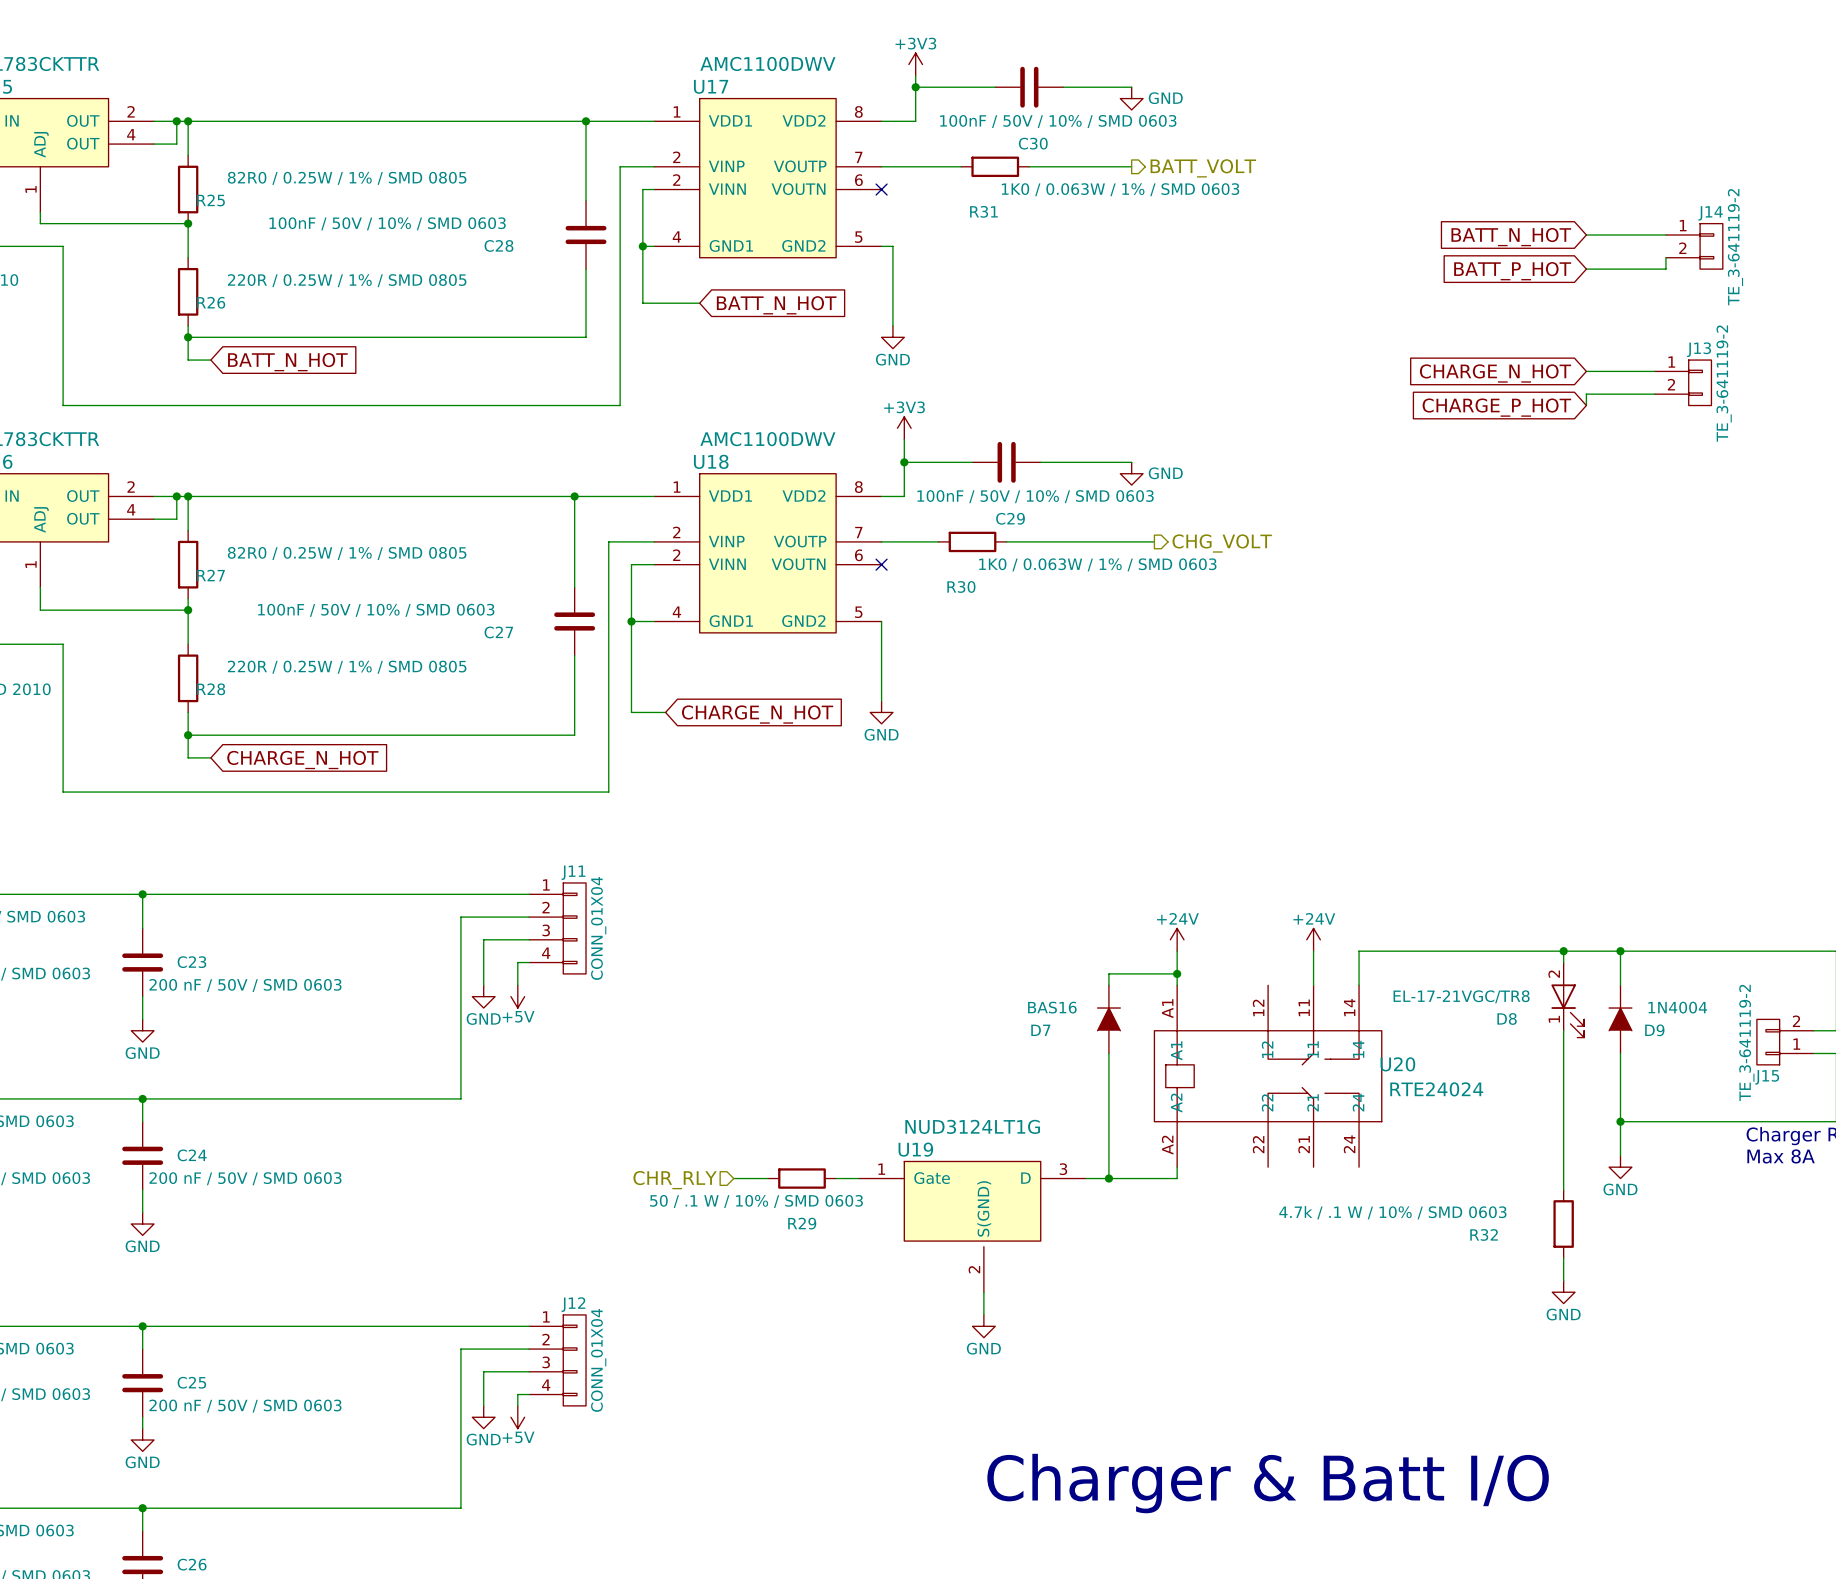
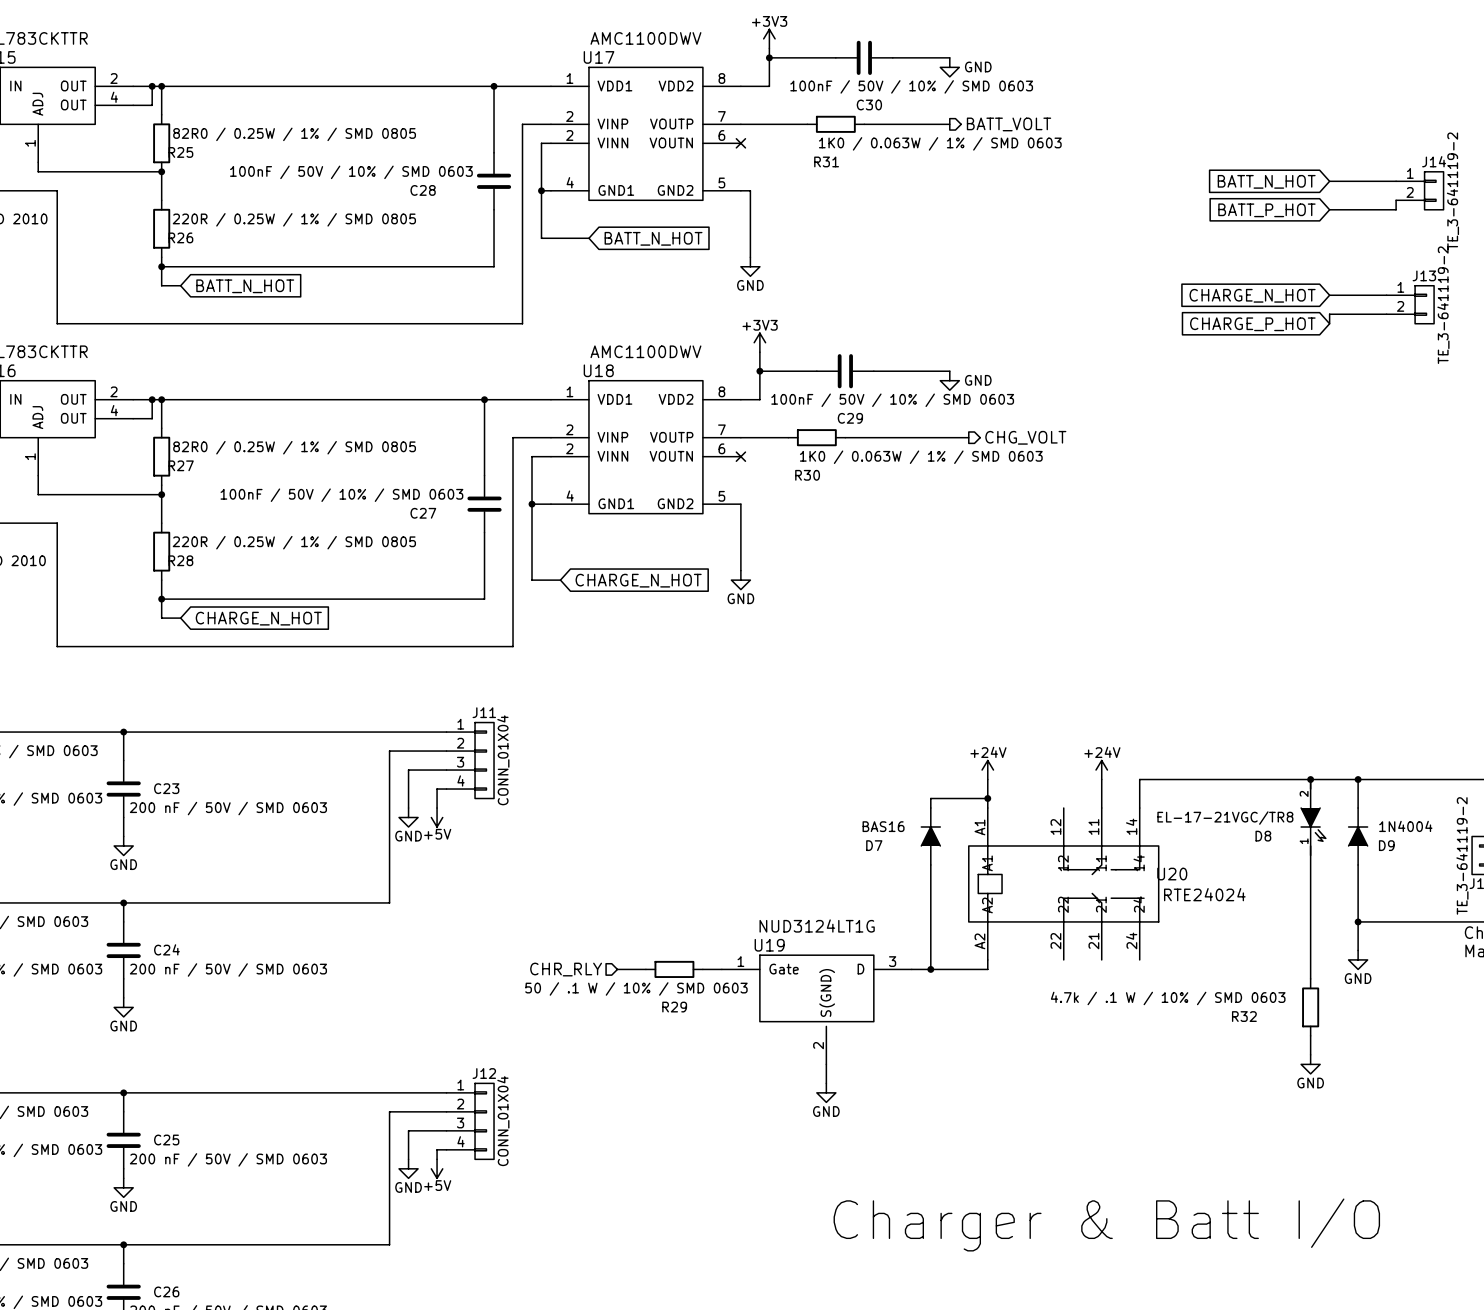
D8 symbol: [1551, 962, 1585, 1038] -> [1301, 779, 1326, 856]

